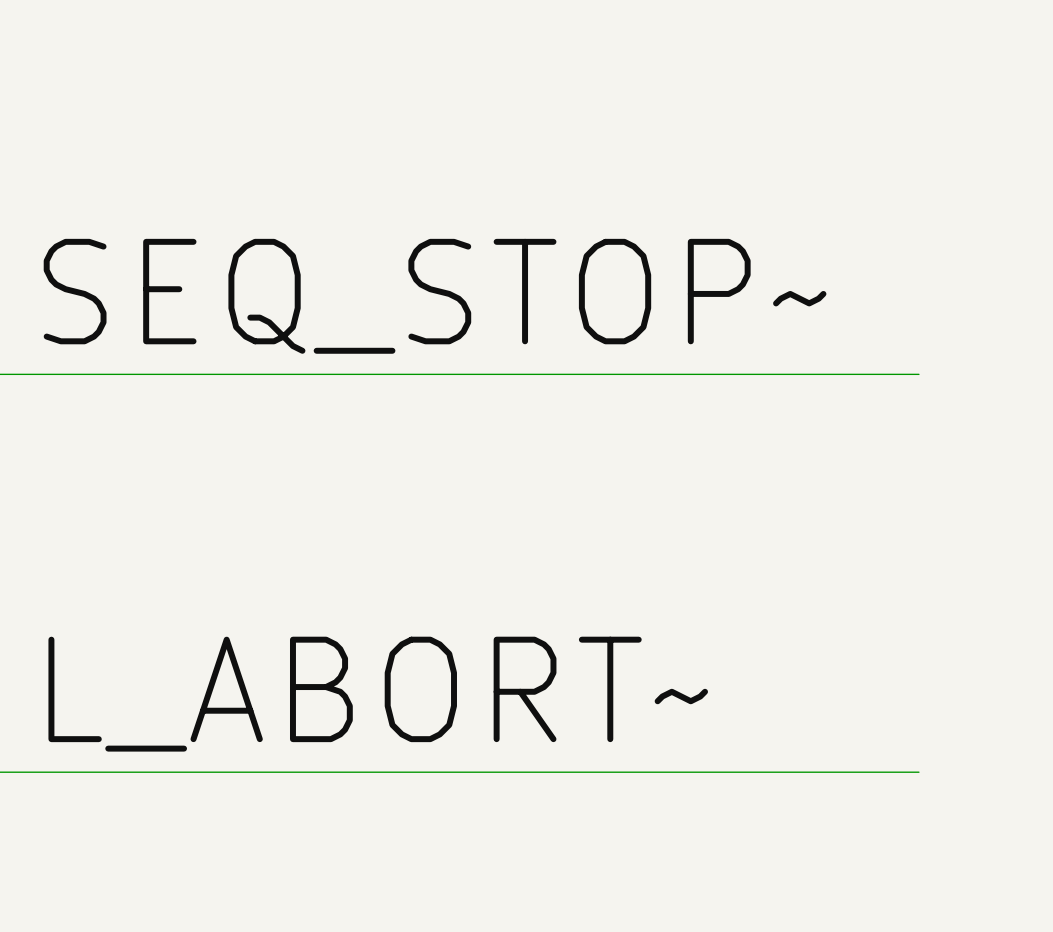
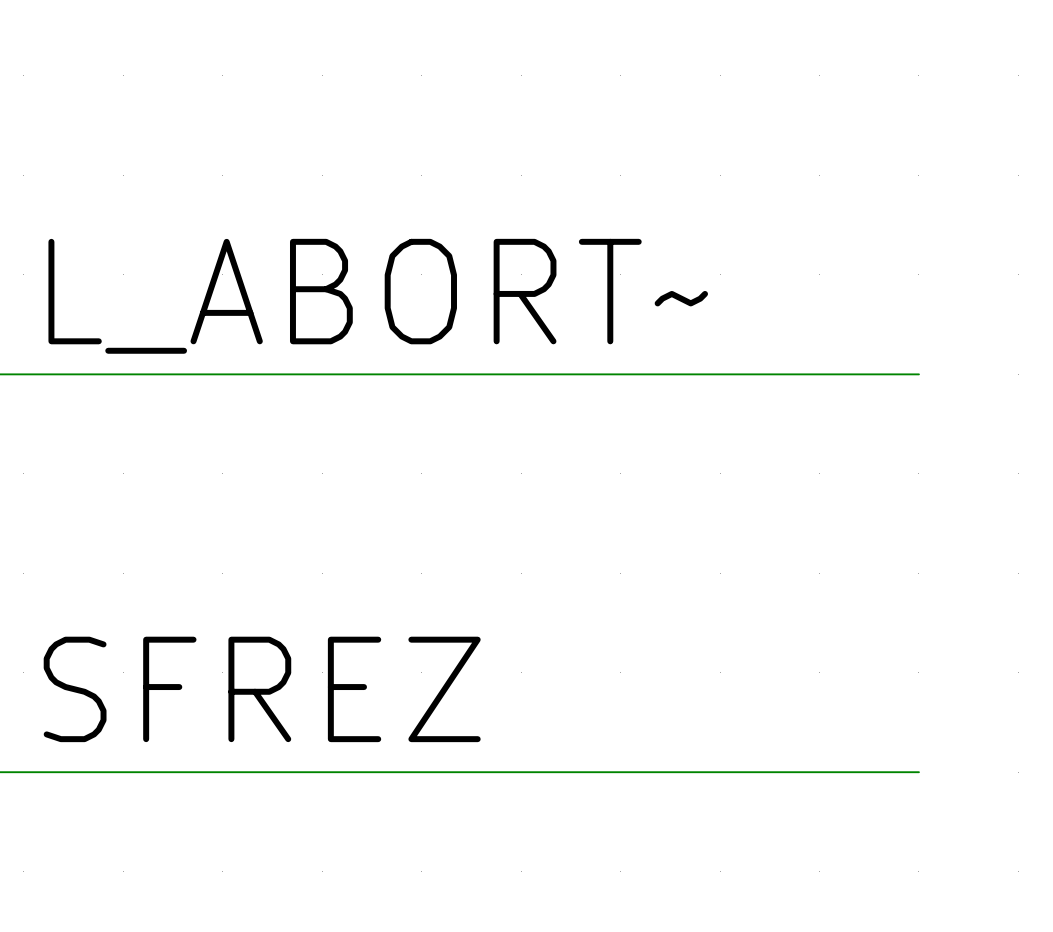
label: SEQ_STOP~ (435, 296) -> L_ABORT~ (378, 296)
label: L_ABORT~ (378, 694) -> SFREZ (262, 689)

